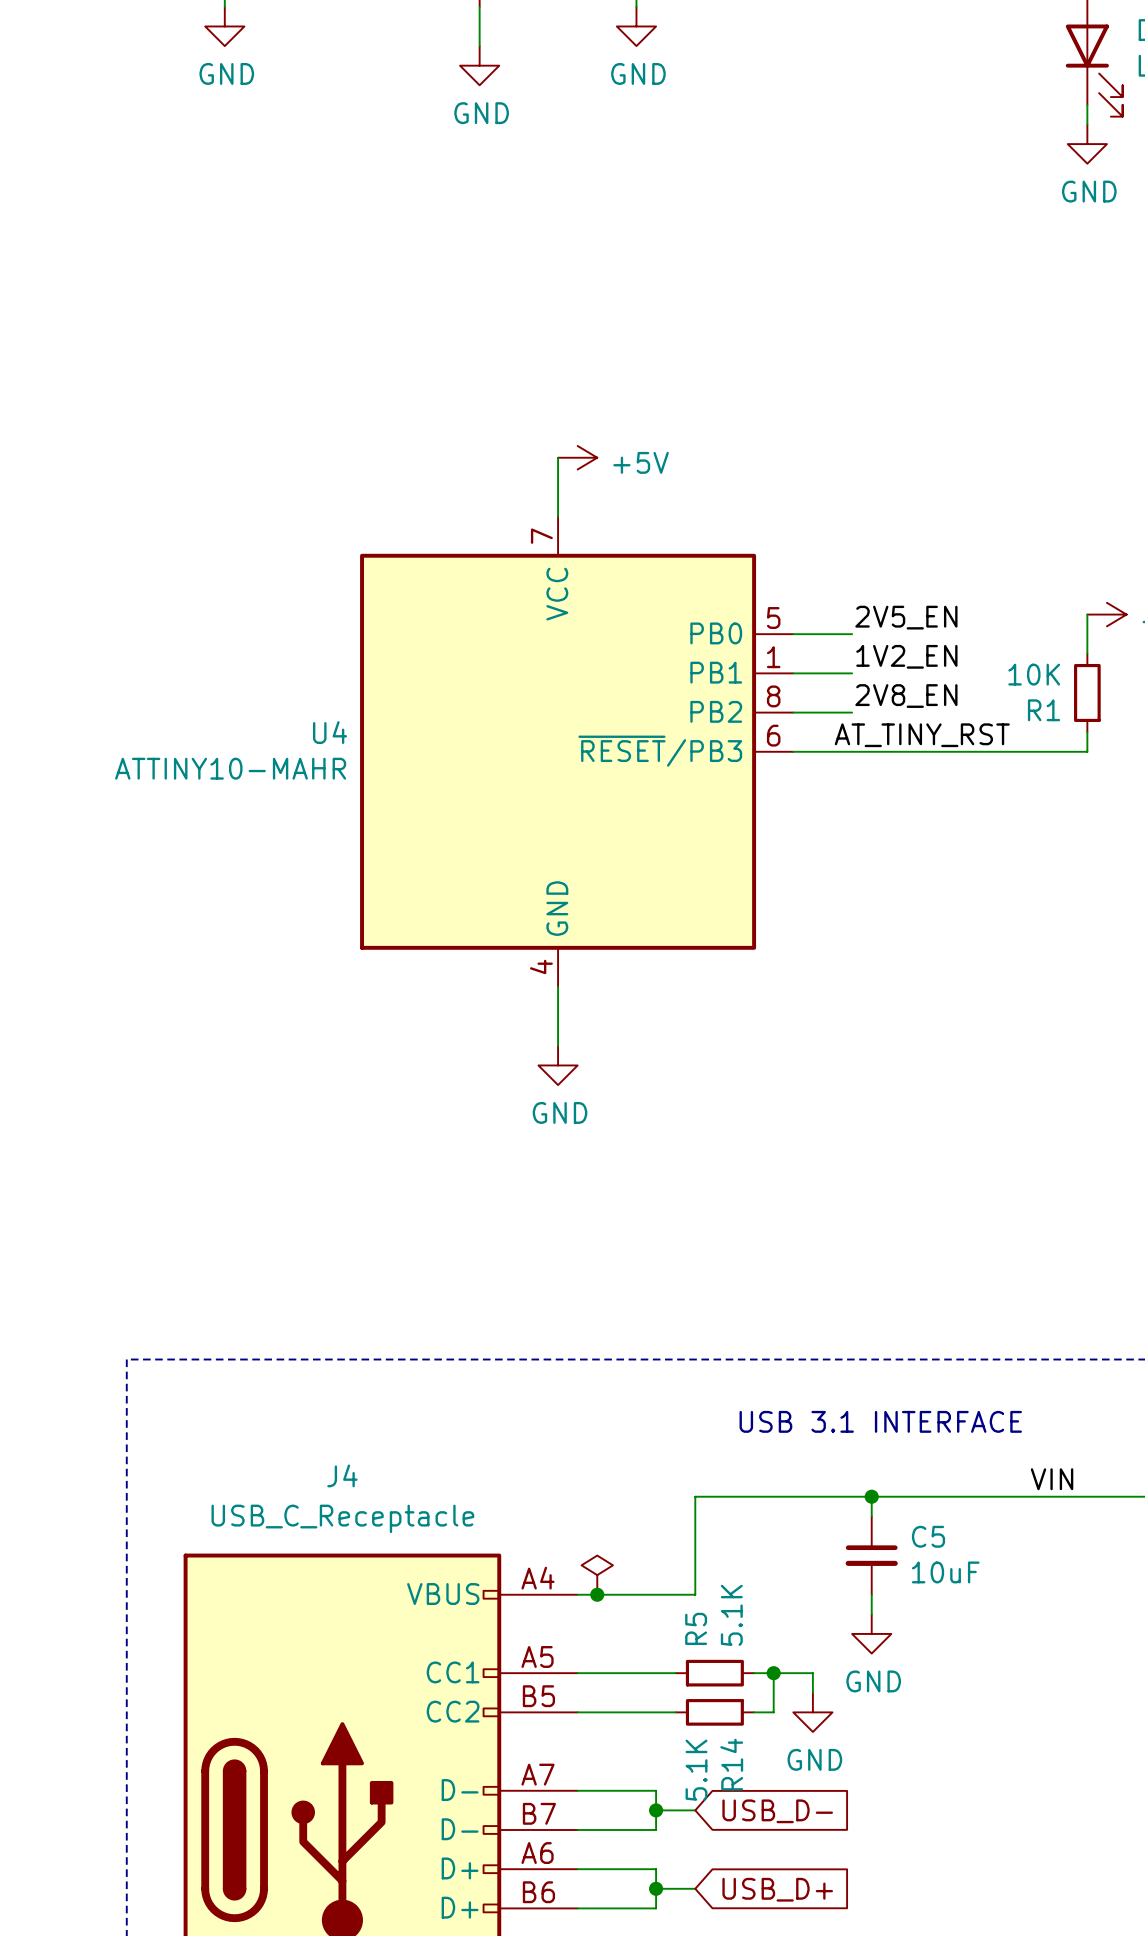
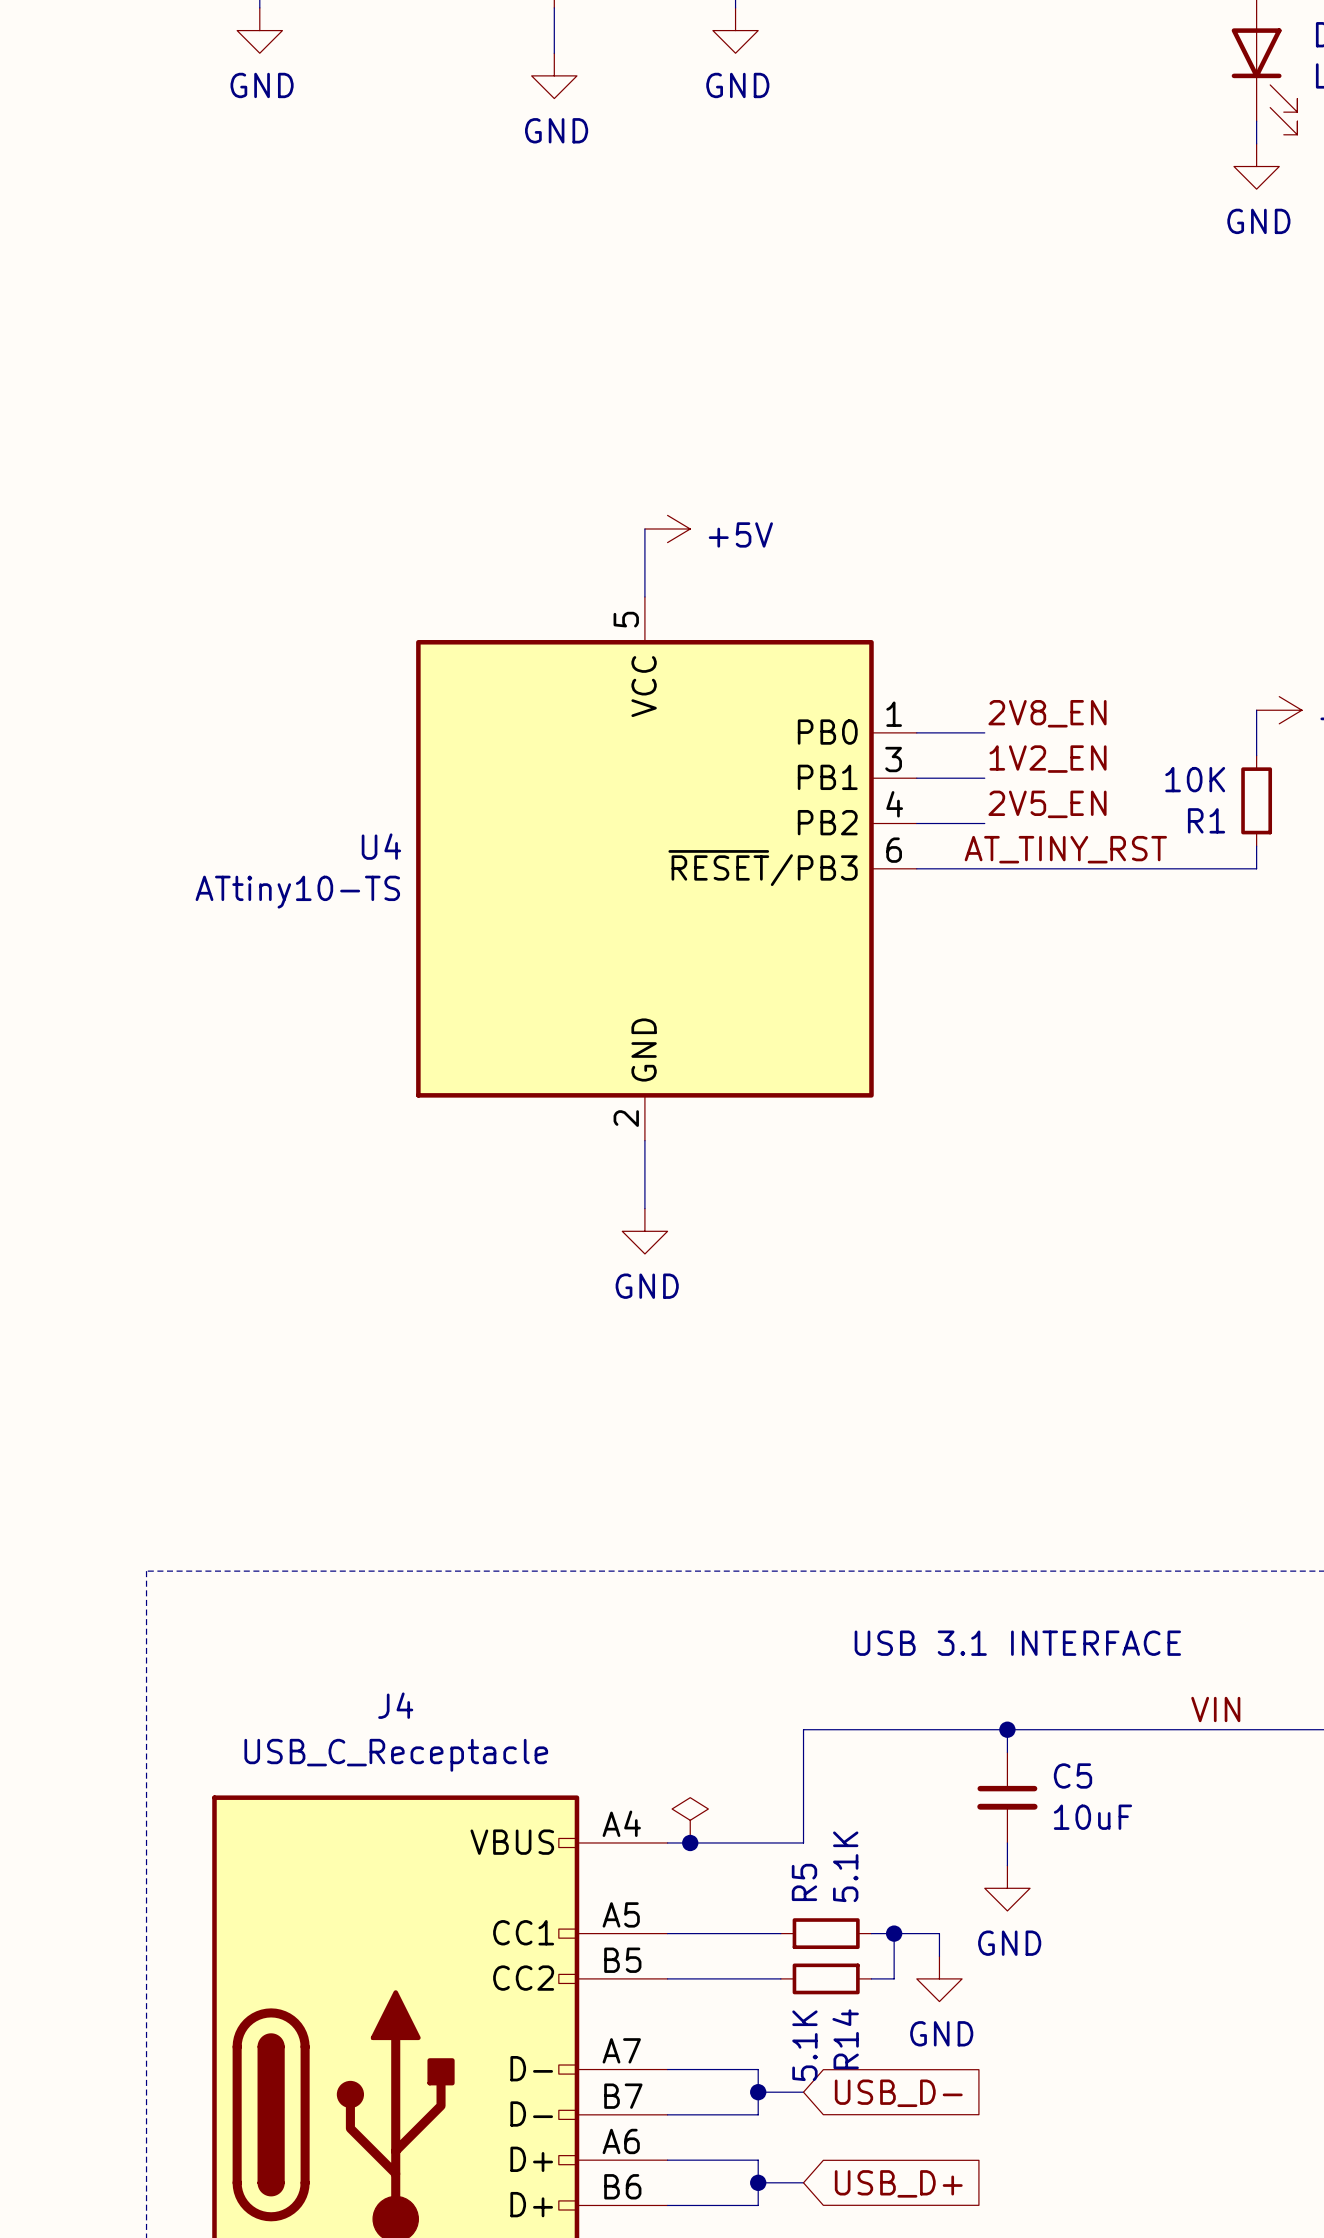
U4 pin number: 7 (541, 536) -> 5 (626, 619)
label: 2V5_EN (906, 617) -> 2V8_EN (1047, 713)
U4 pin number: 5 (773, 618) -> 1 (894, 714)
U4 pin number: 1 (773, 657) -> 3 (893, 759)
U4 pin number: 8 (773, 696) -> 4 (894, 804)
label: 2V8_EN (906, 696) -> 2V5_EN (1047, 804)
U4 value: ATTINY10-MAHR (230, 768) -> ATtiny10-TS (297, 892)
U4 pin number: 4 (541, 966) -> 2 (626, 1118)

